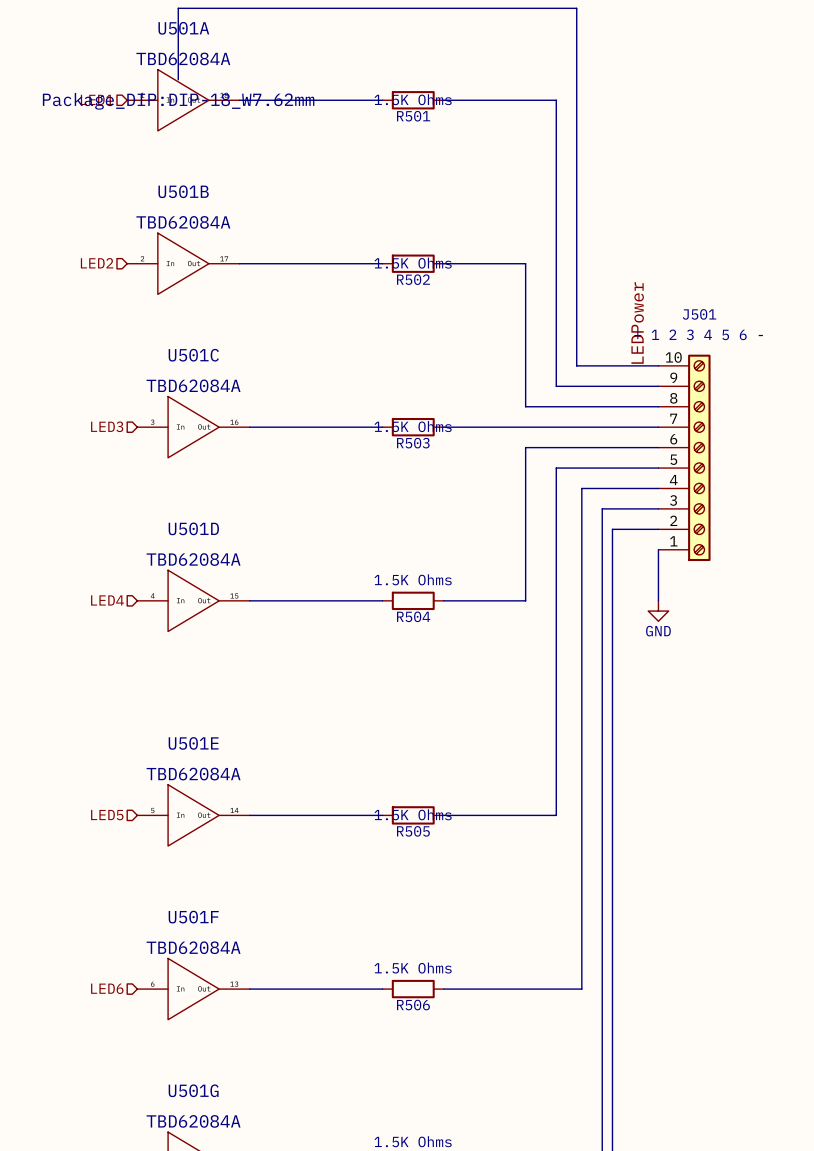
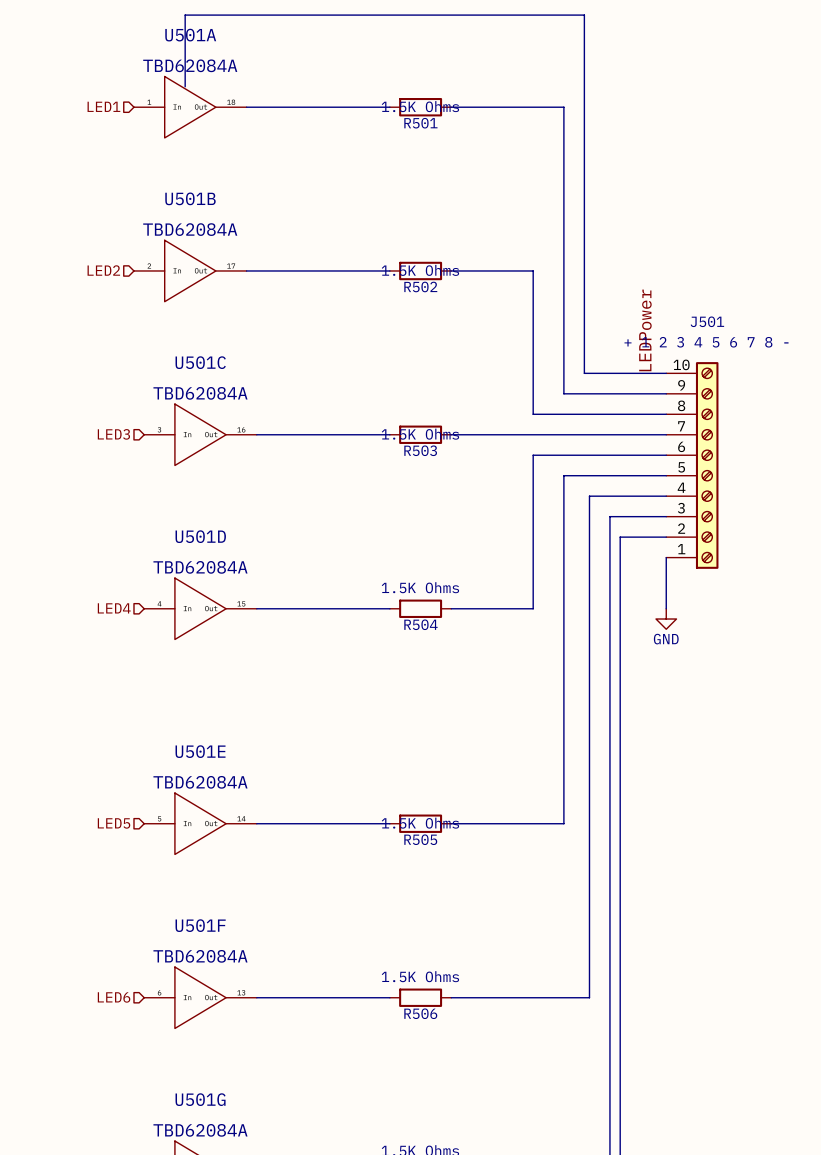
U501A text: Package_DIP:DIP-18_W7.62mm (178, 101) -> none
J501 value: + 1 2 3 4 5 6 - (698, 334) -> + 1 2 3 4 5 6 7 8 - (706, 342)

